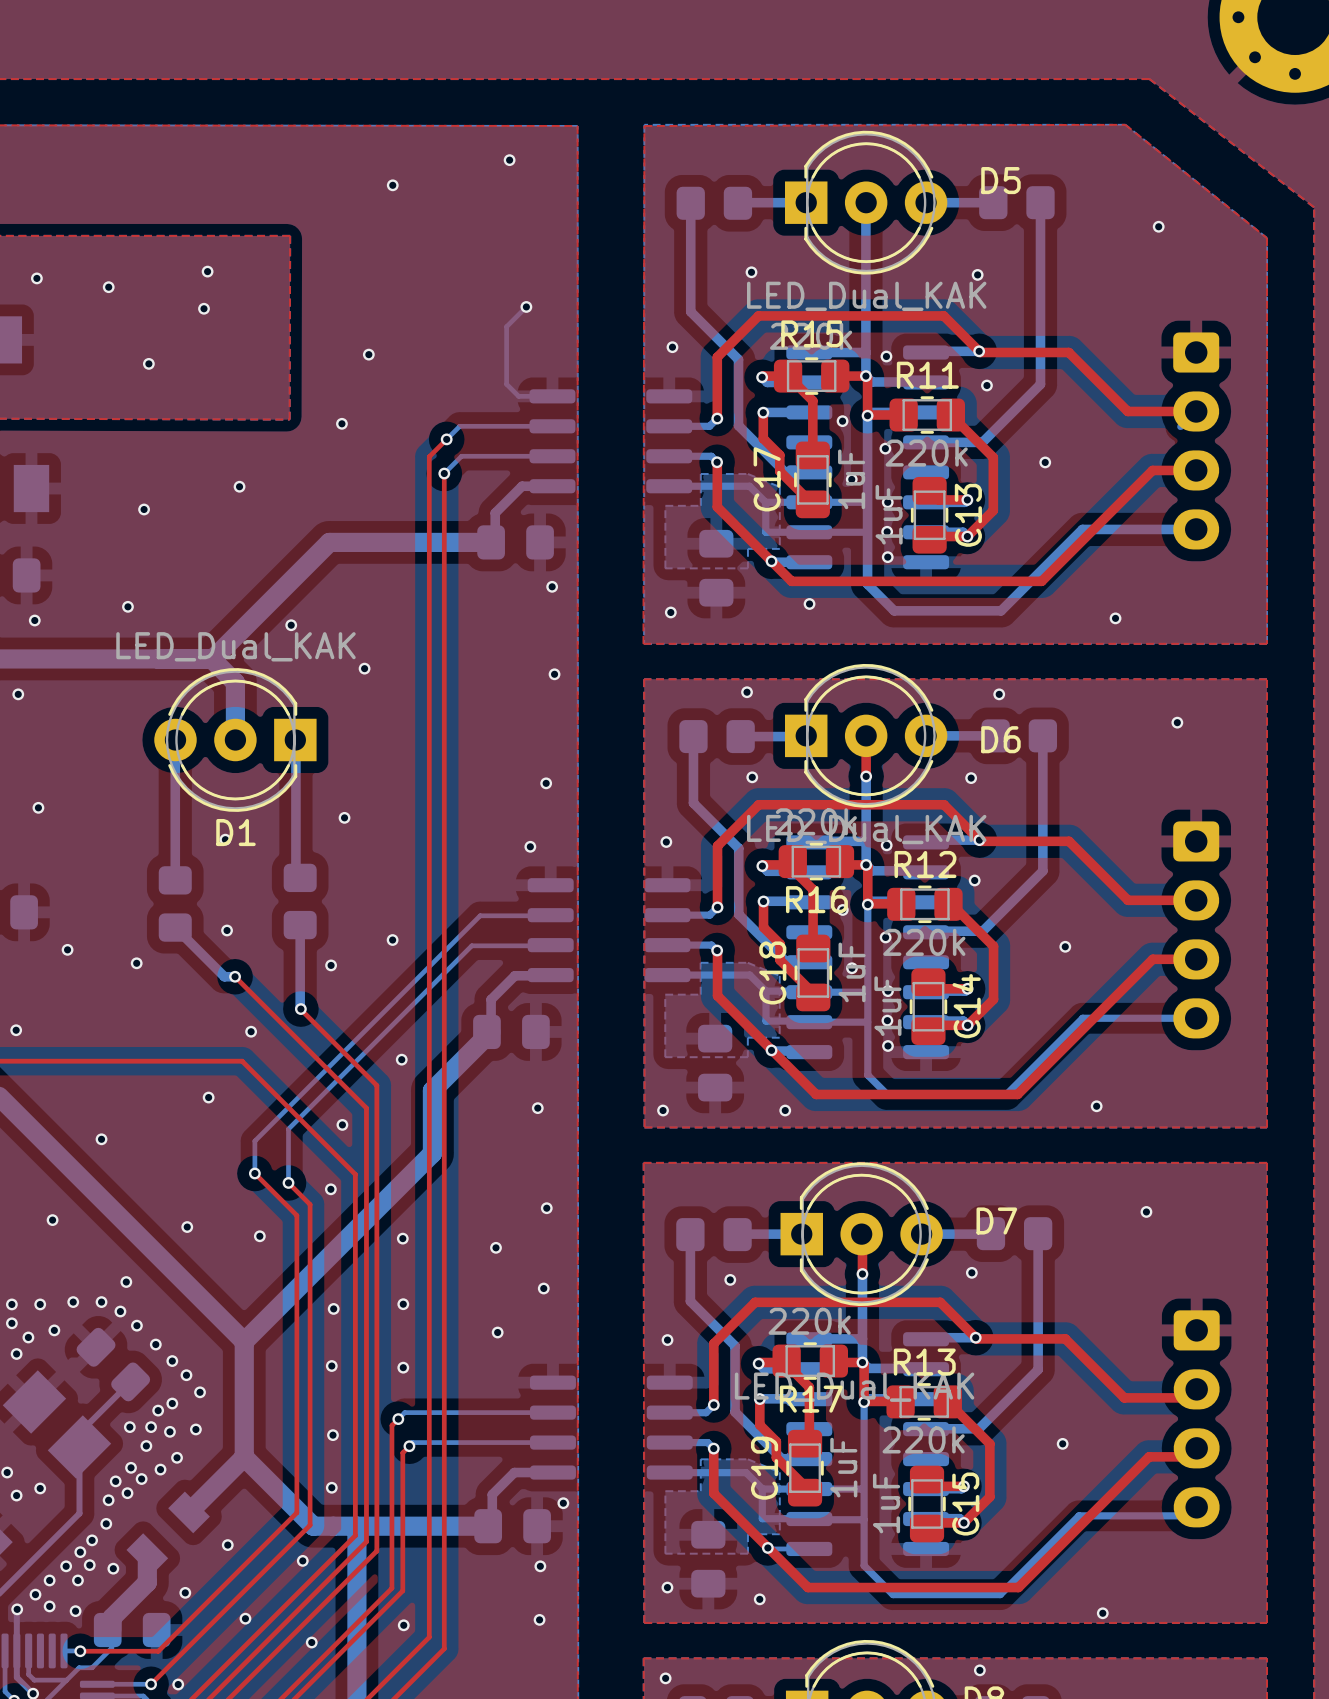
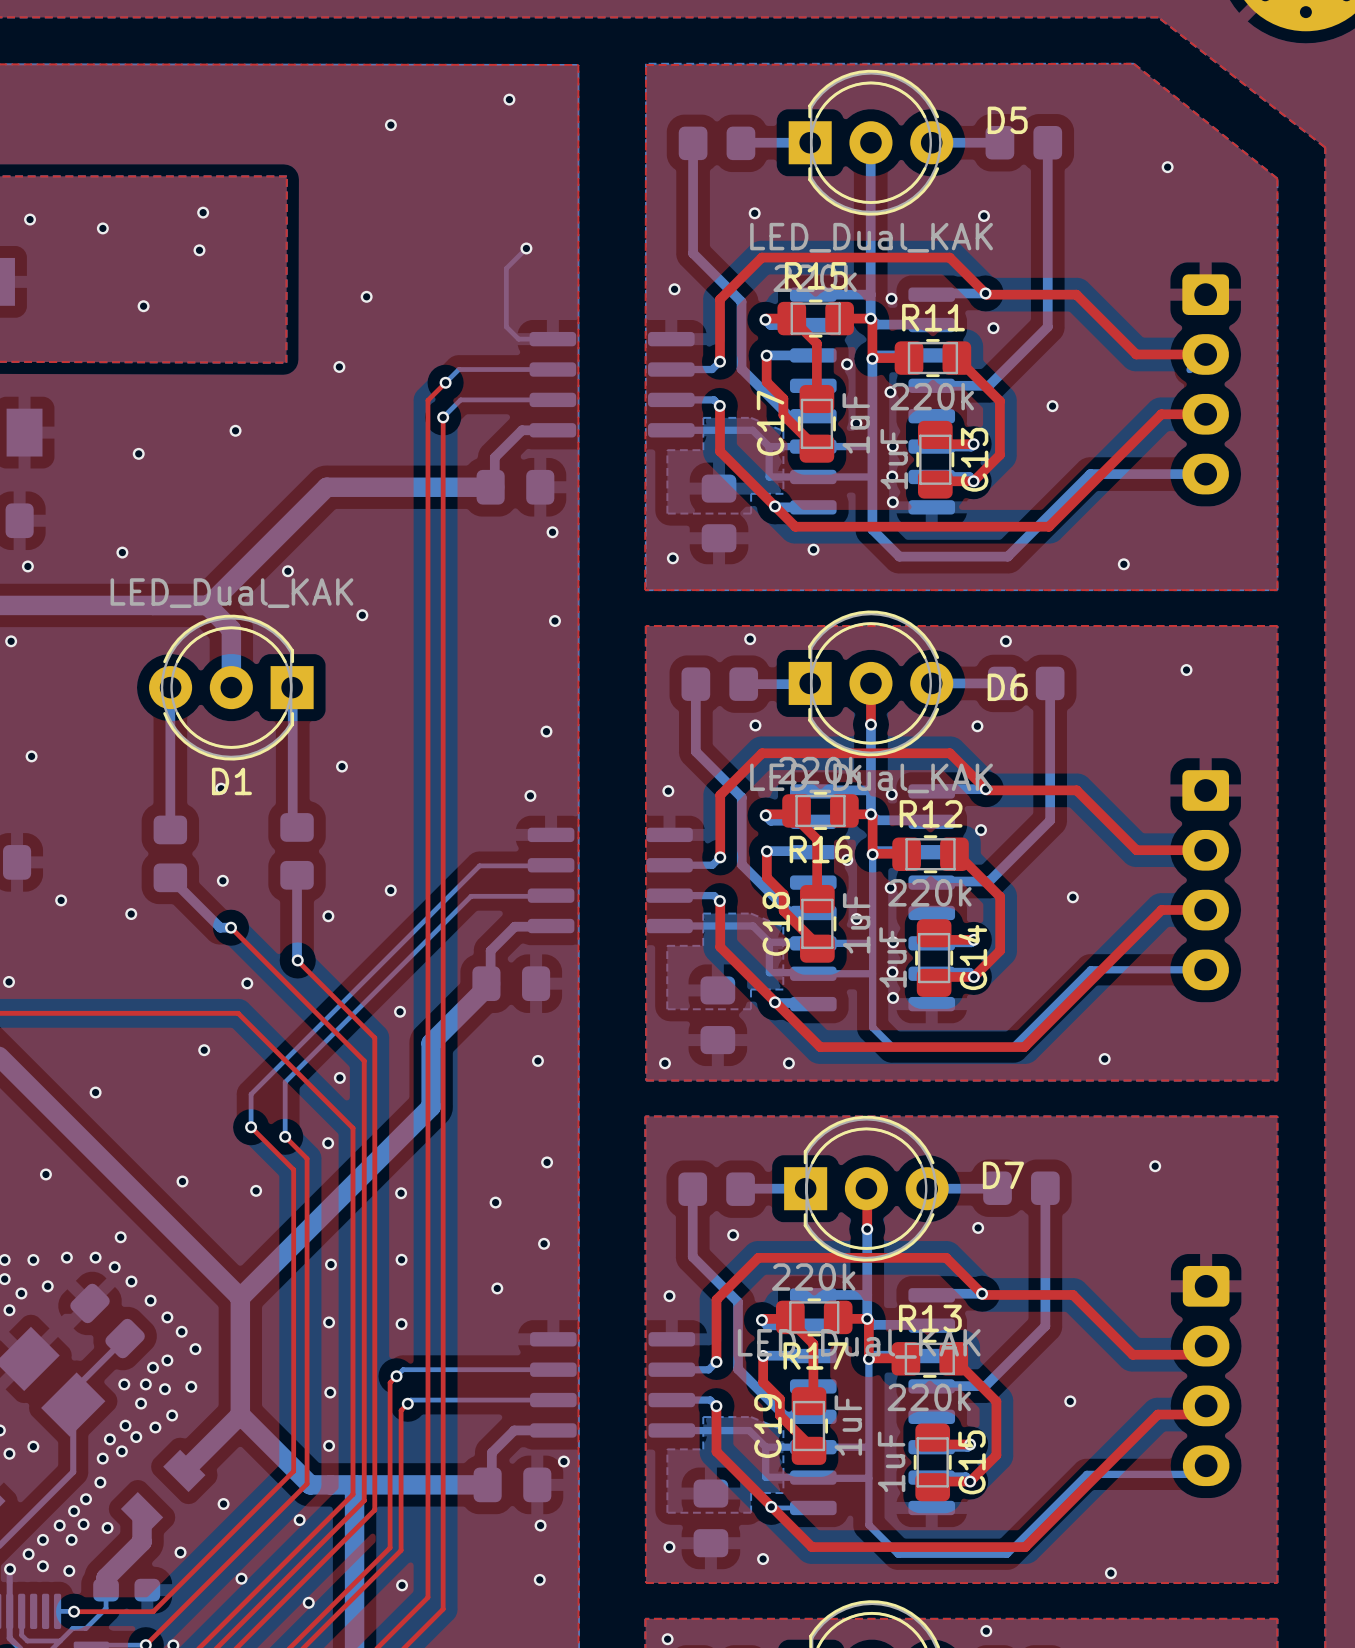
part footprint: [93, 1612, 171, 1648] -> [93, 1578, 161, 1602]

